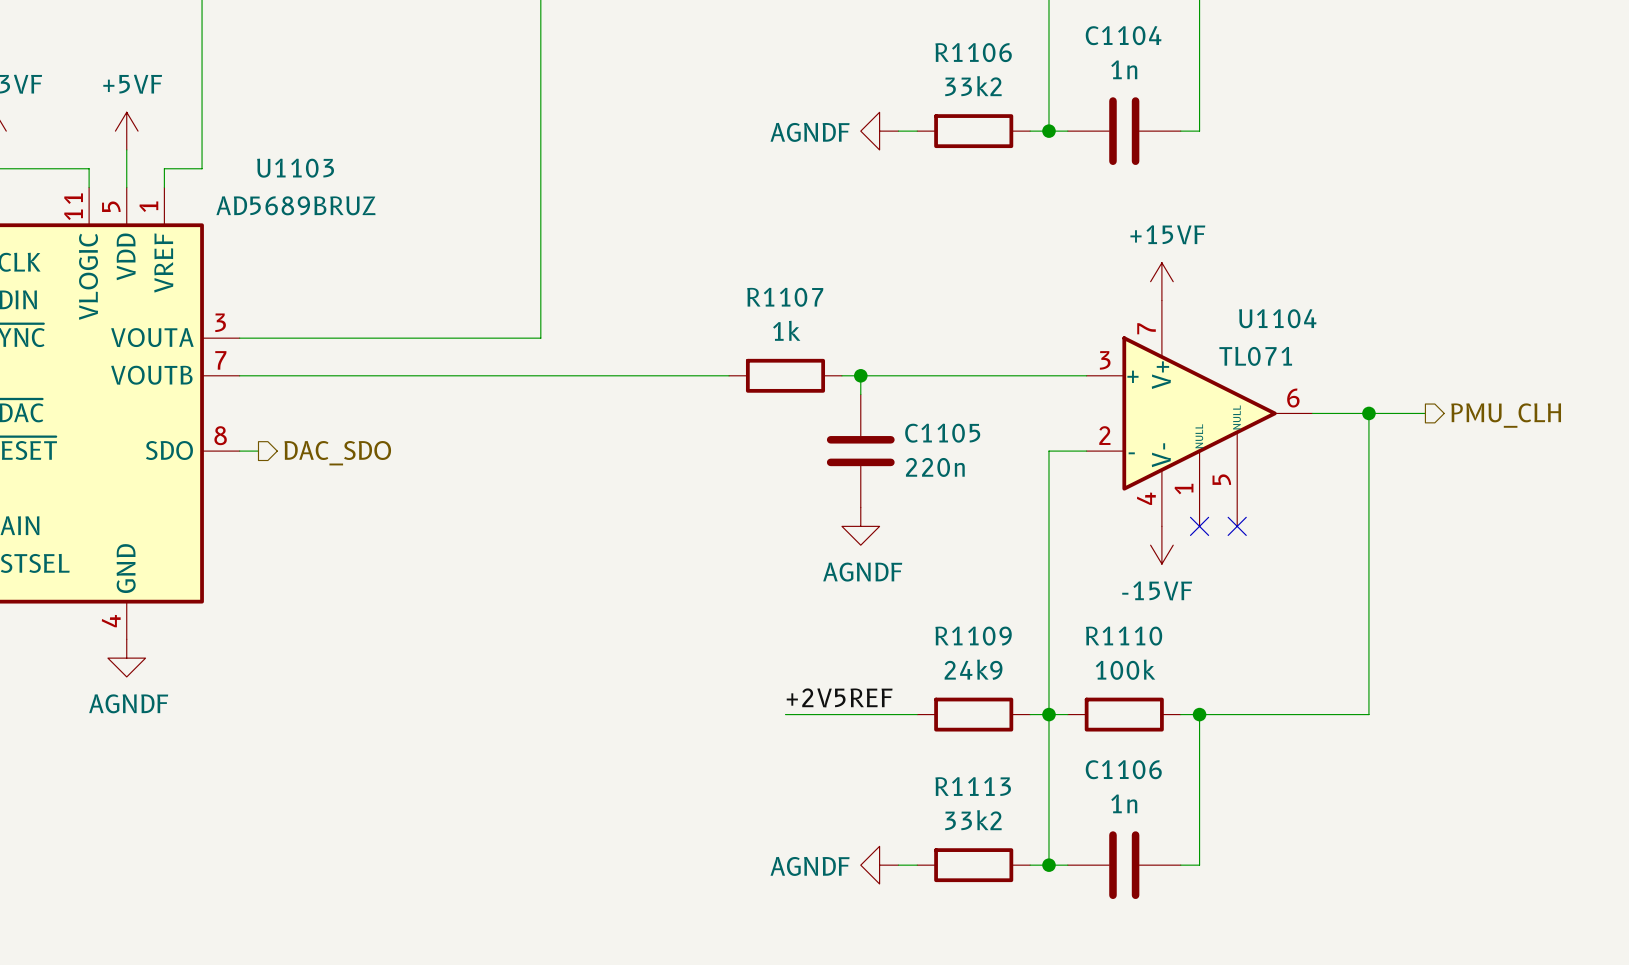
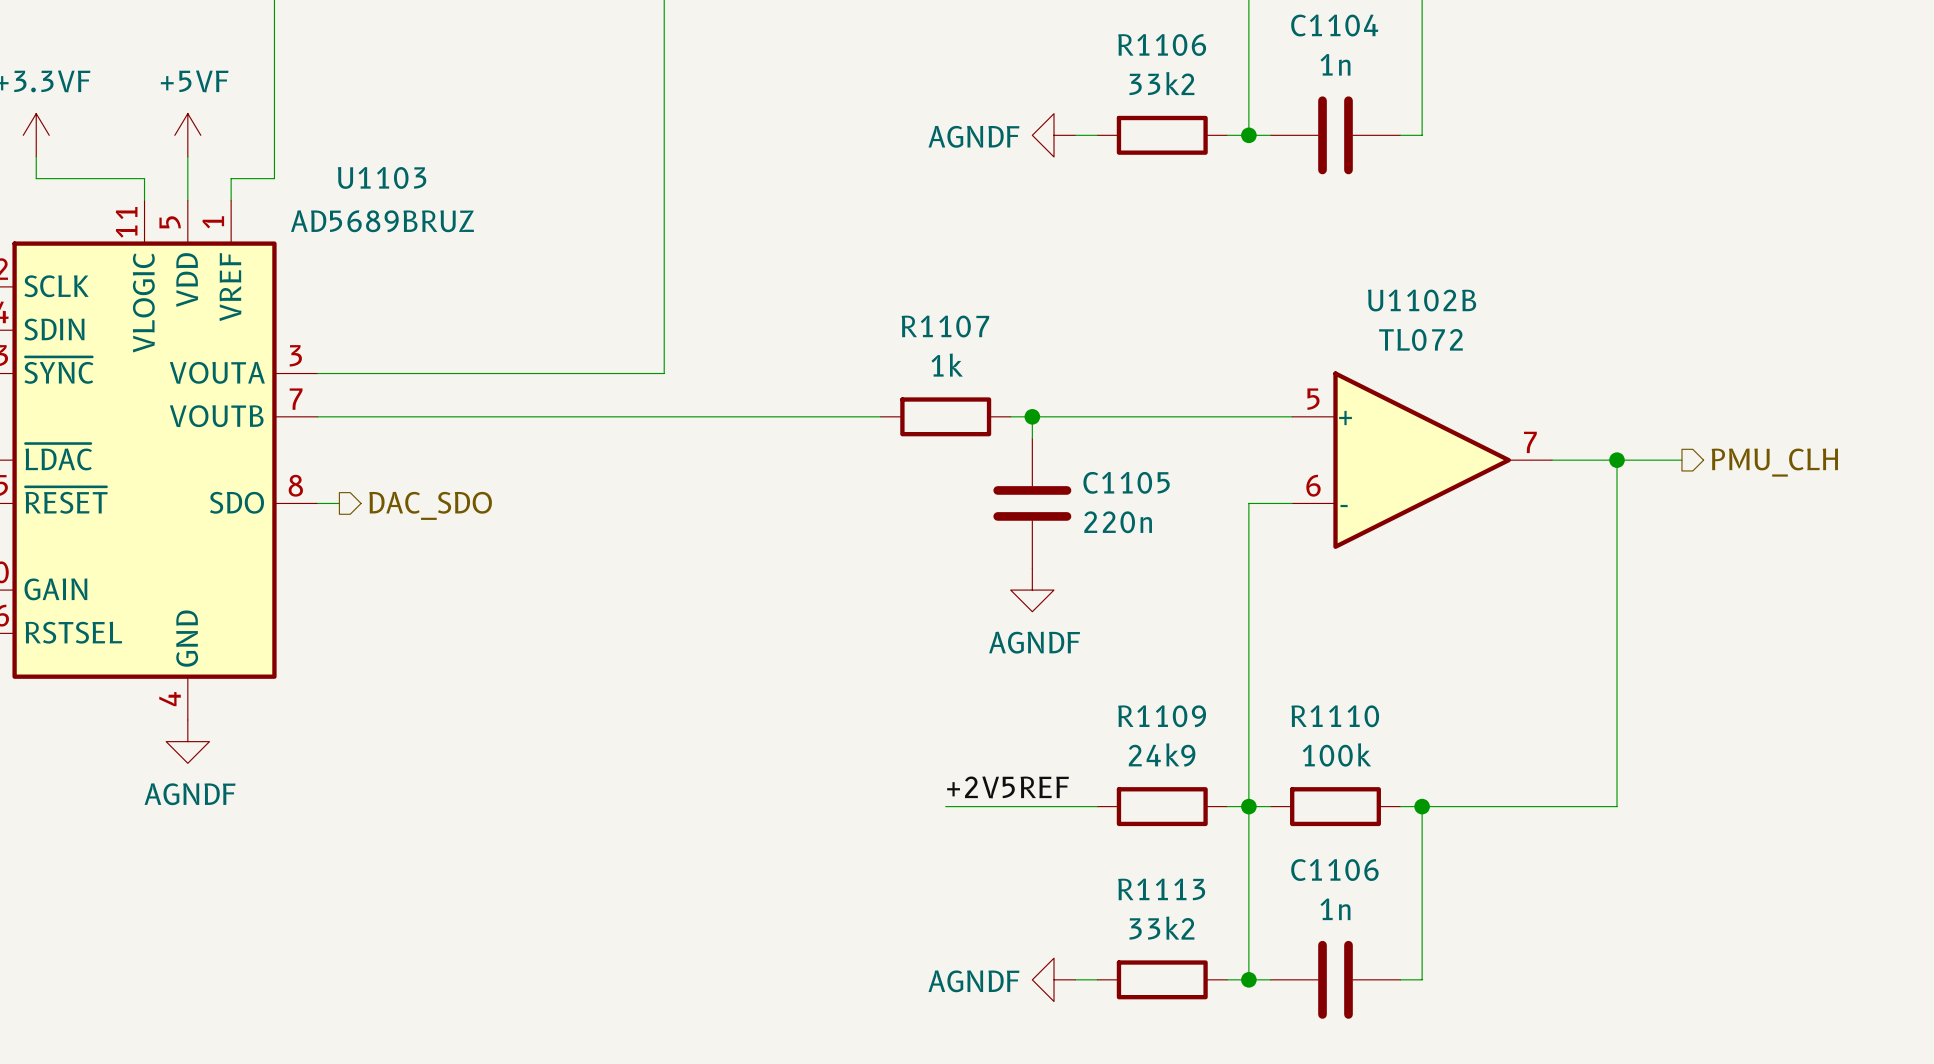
power symbol: +15VF (1161, 281) -> none
U1104: TL071 (1199, 413) -> none
U1102B: none -> TL072 (1422, 460)
no-connect mark: (1199, 526) -> none
no-connect mark: (1237, 526) -> none
power symbol: -15VF (1161, 545) -> none

